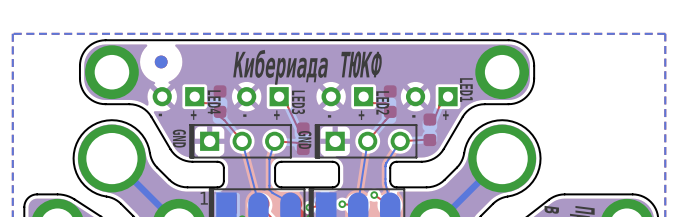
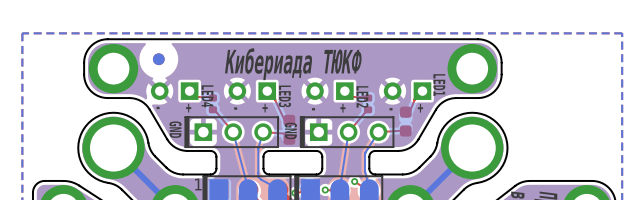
part footprint: [213, 85, 227, 118] -> [208, 94, 218, 114]
part footprint: [383, 85, 397, 118] -> [364, 94, 373, 114]

